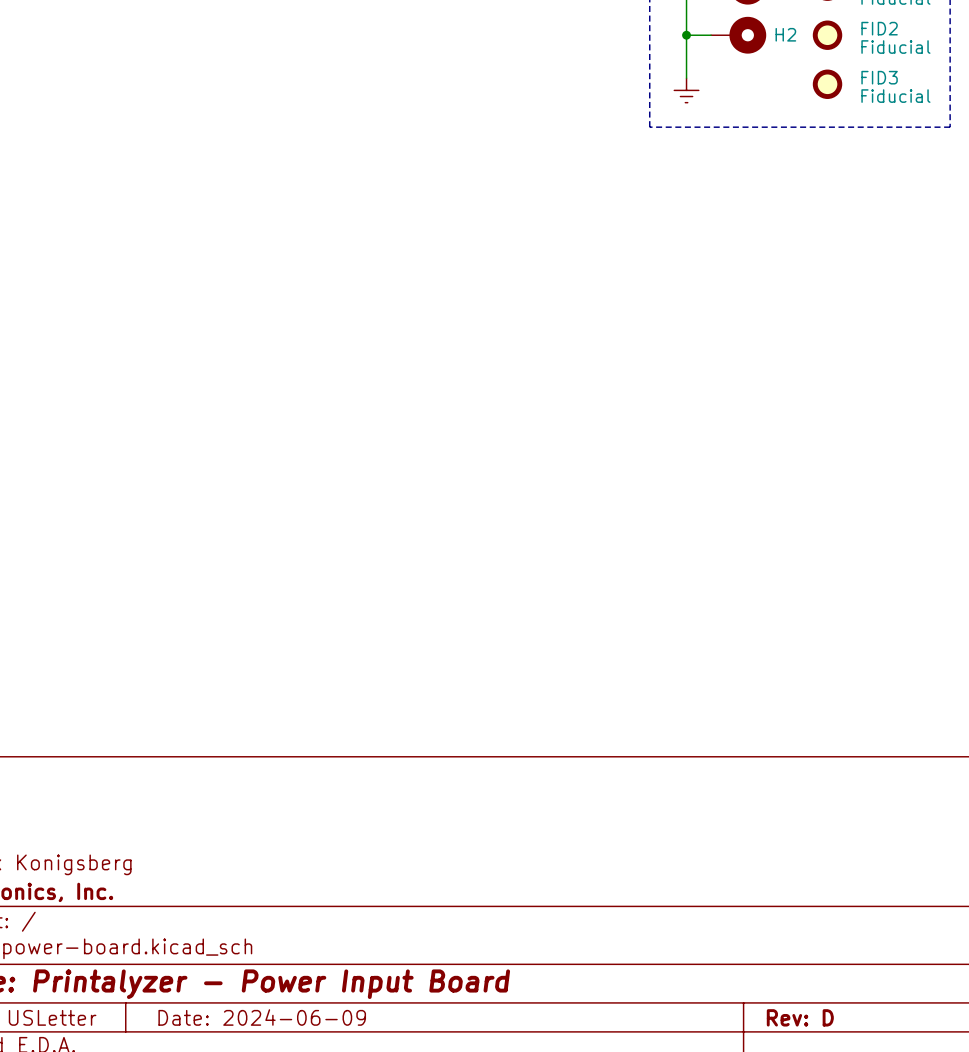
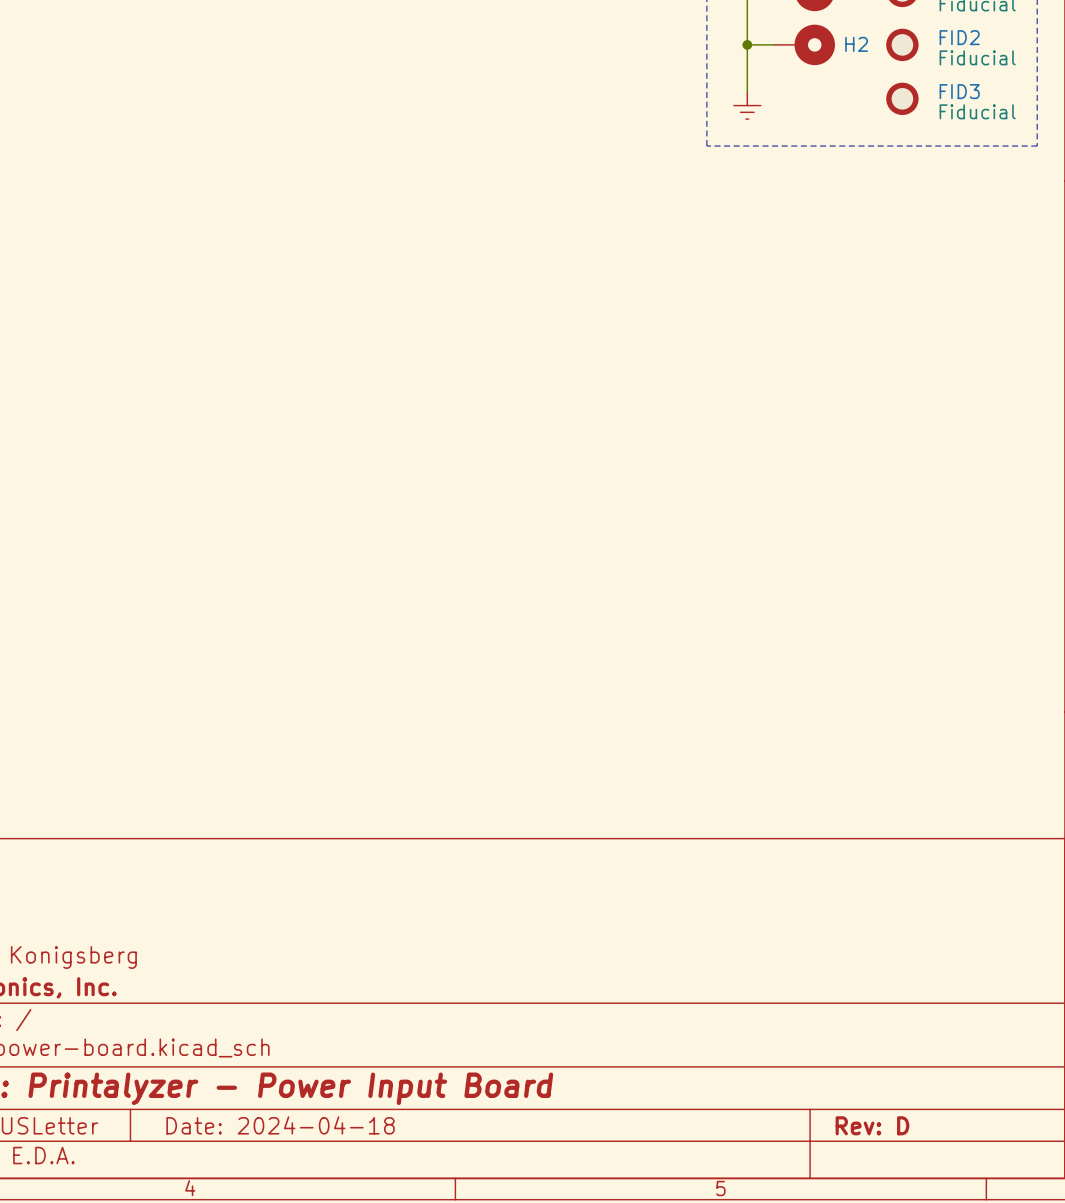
title block: Date: 2024-06-09 (262, 1017) -> Date: 2024-04-18 (280, 1125)

